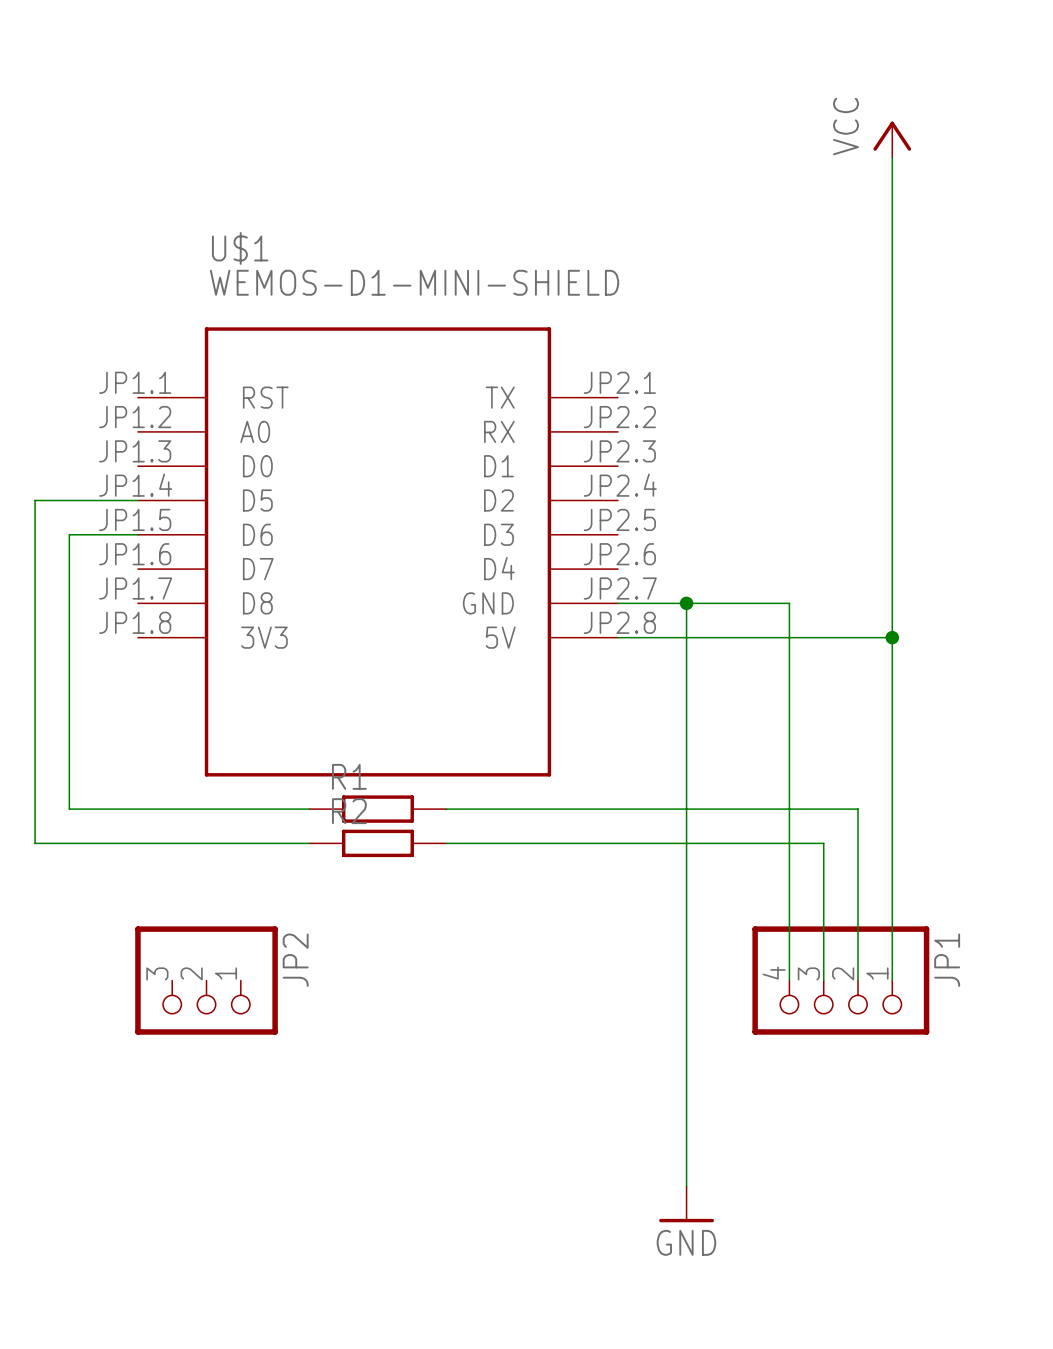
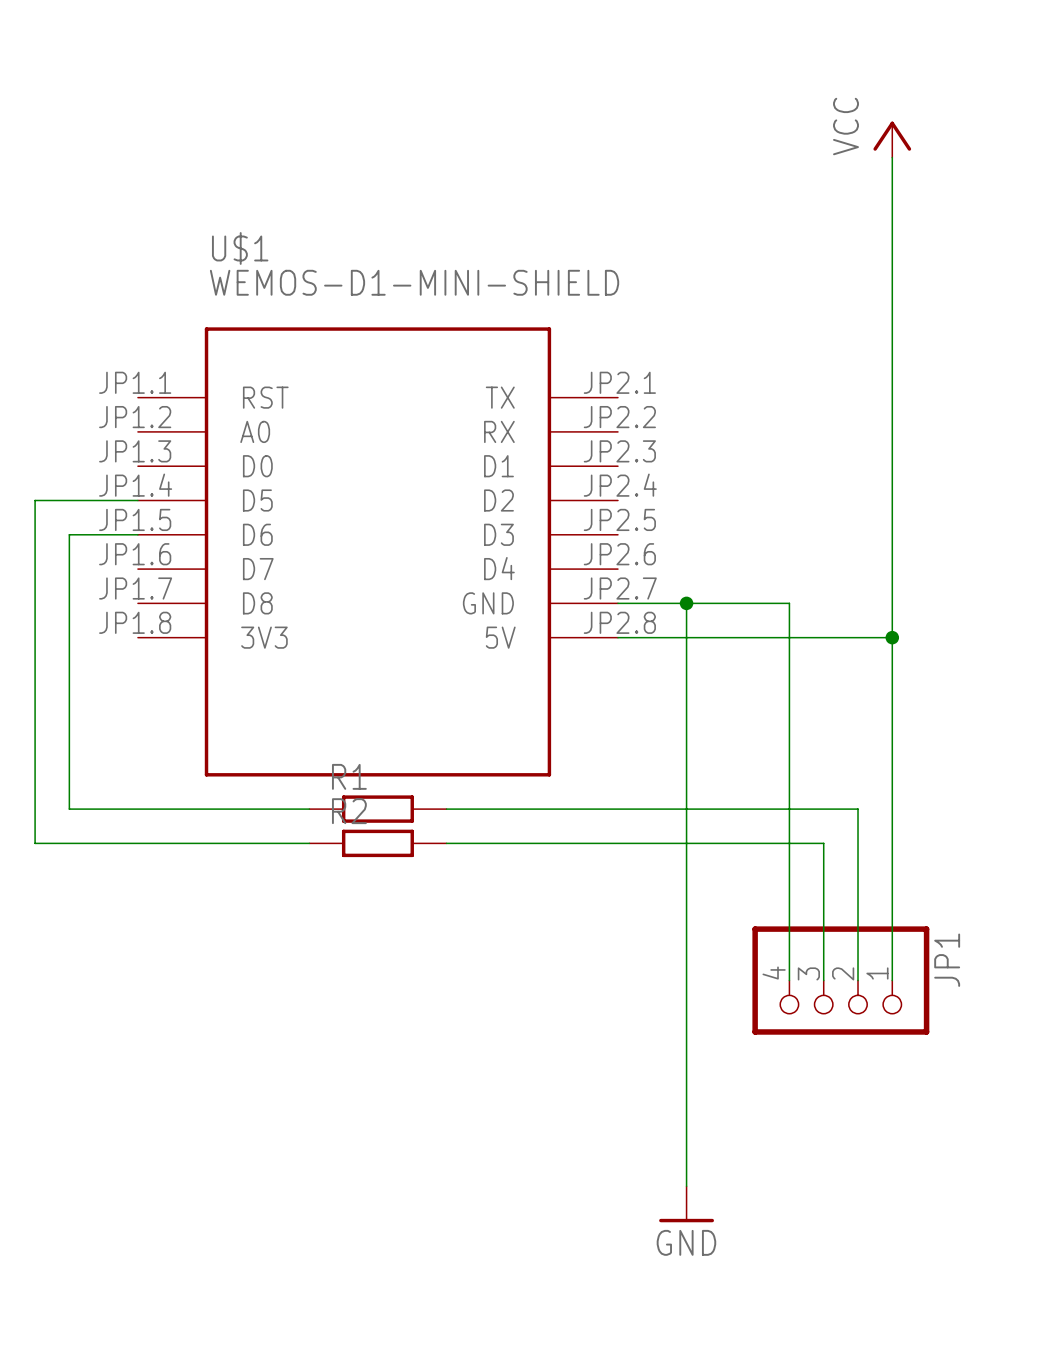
JP2: (206, 980) -> none

